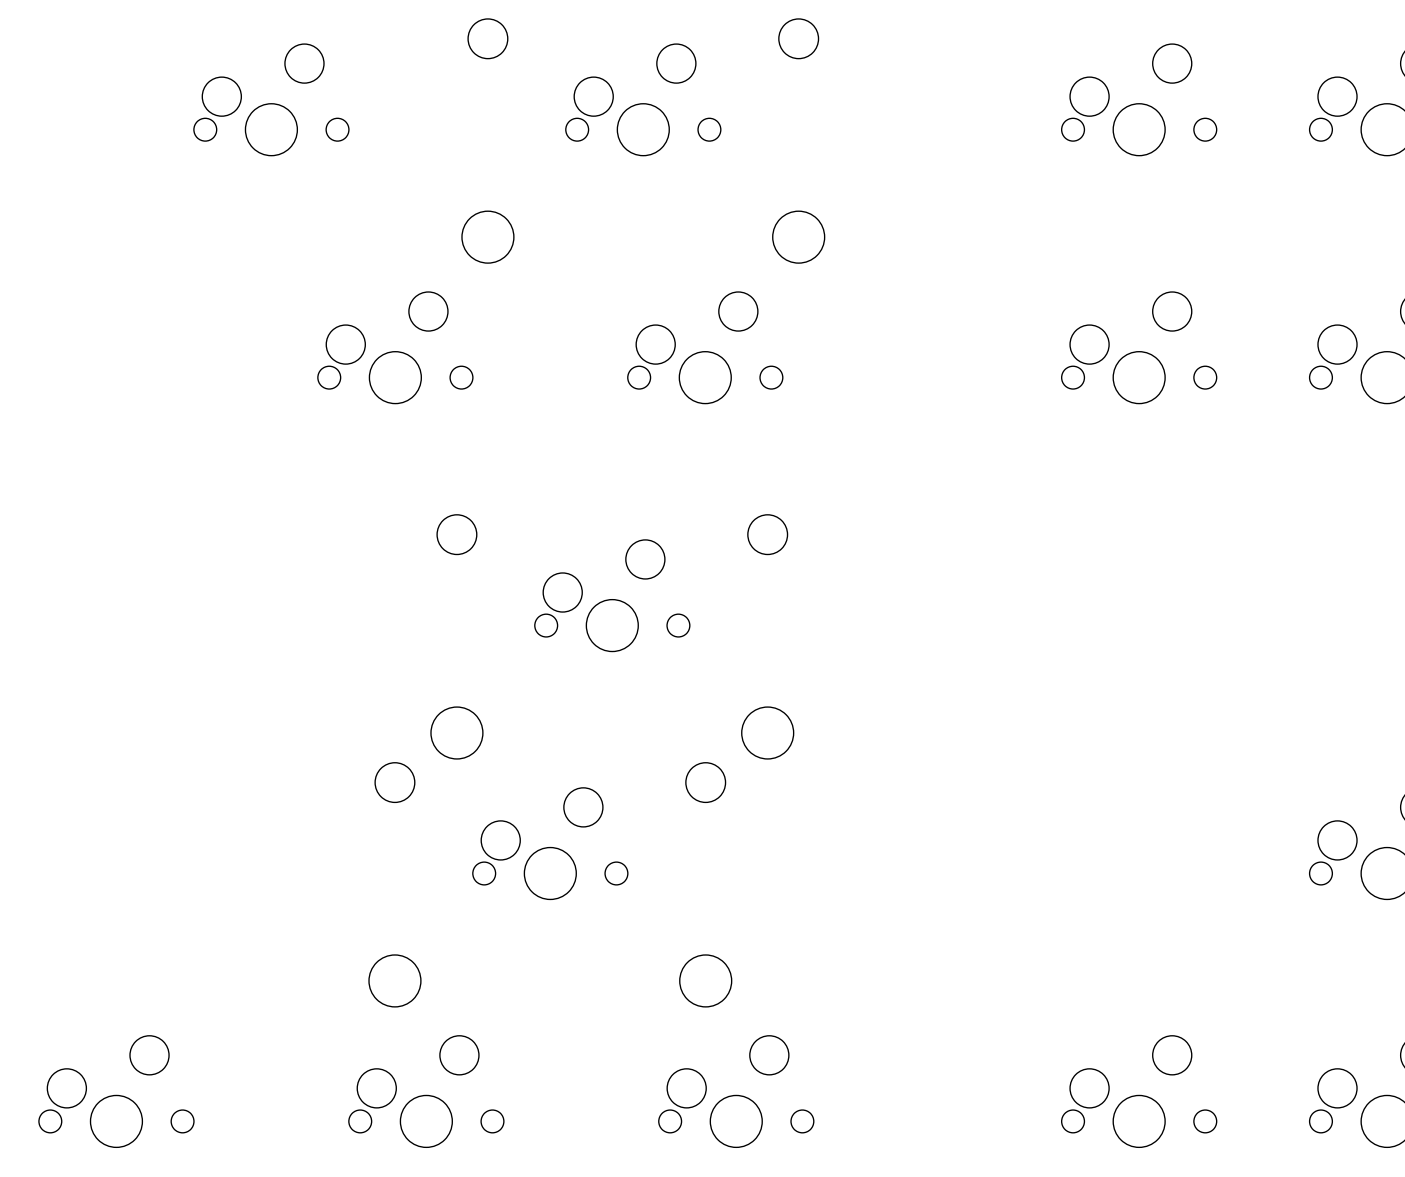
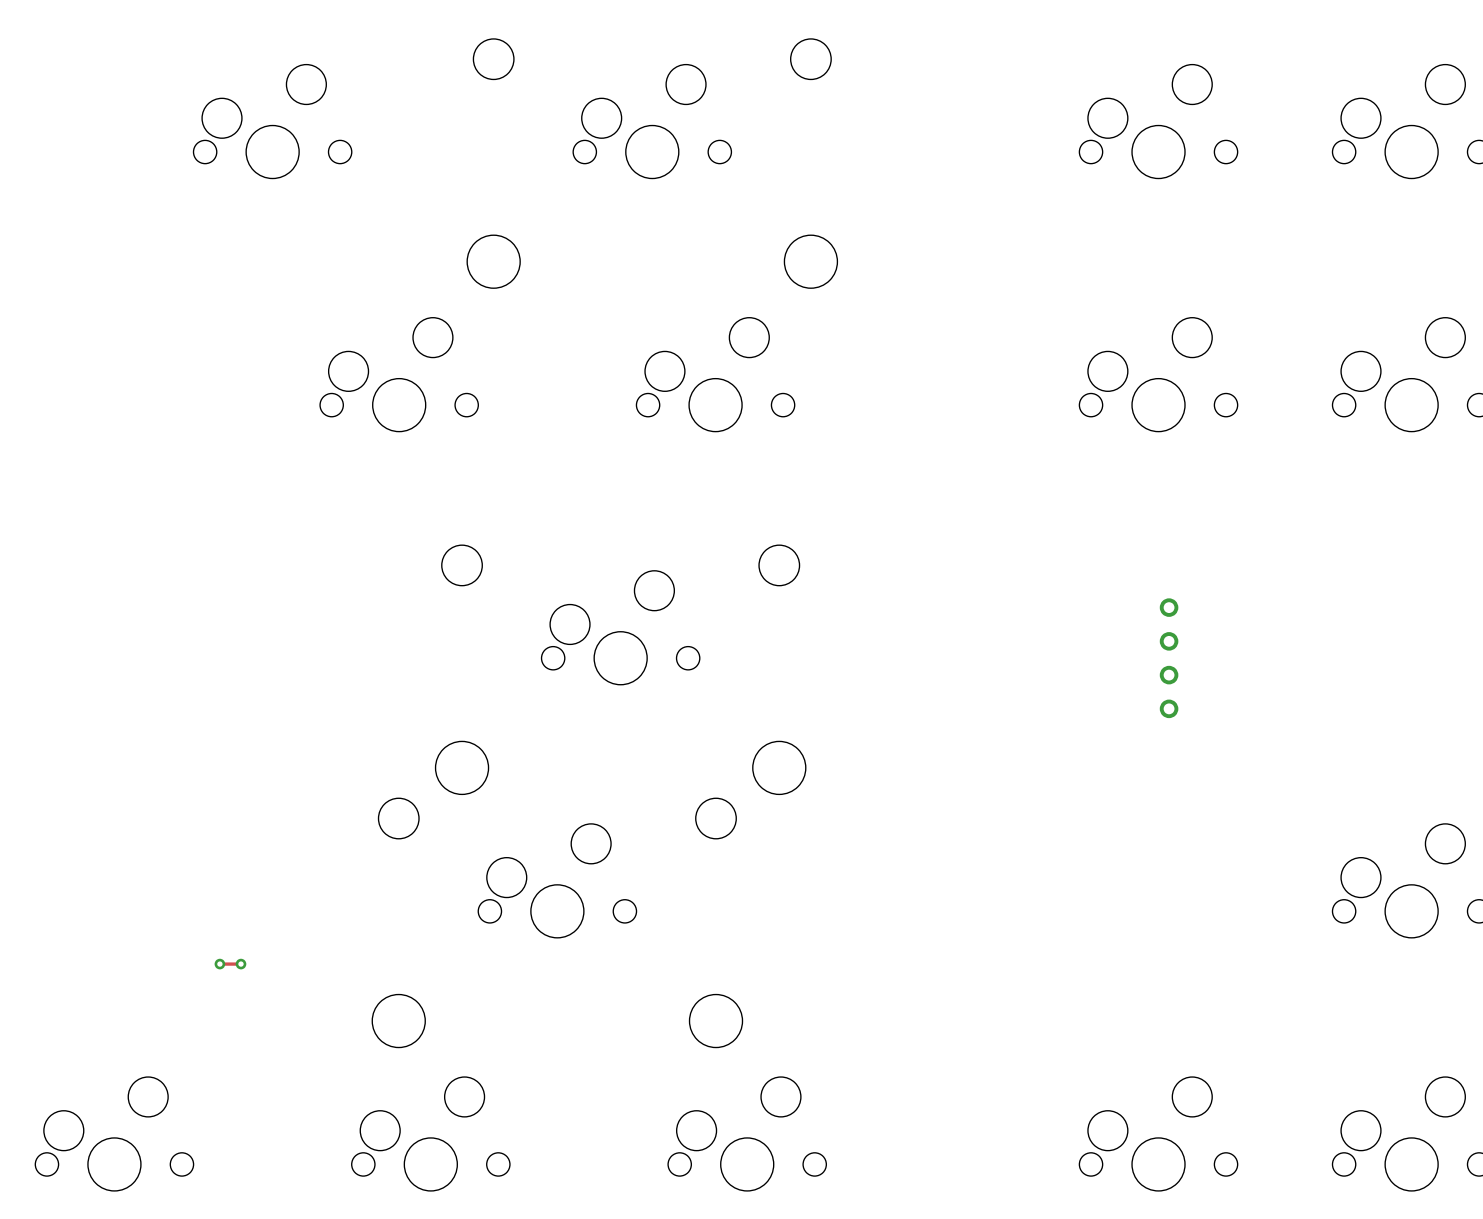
part: none -> (1169, 658)
track: none -> (219, 964) (241, 964)
via: none -> (219, 964)
via: none -> (241, 964)

